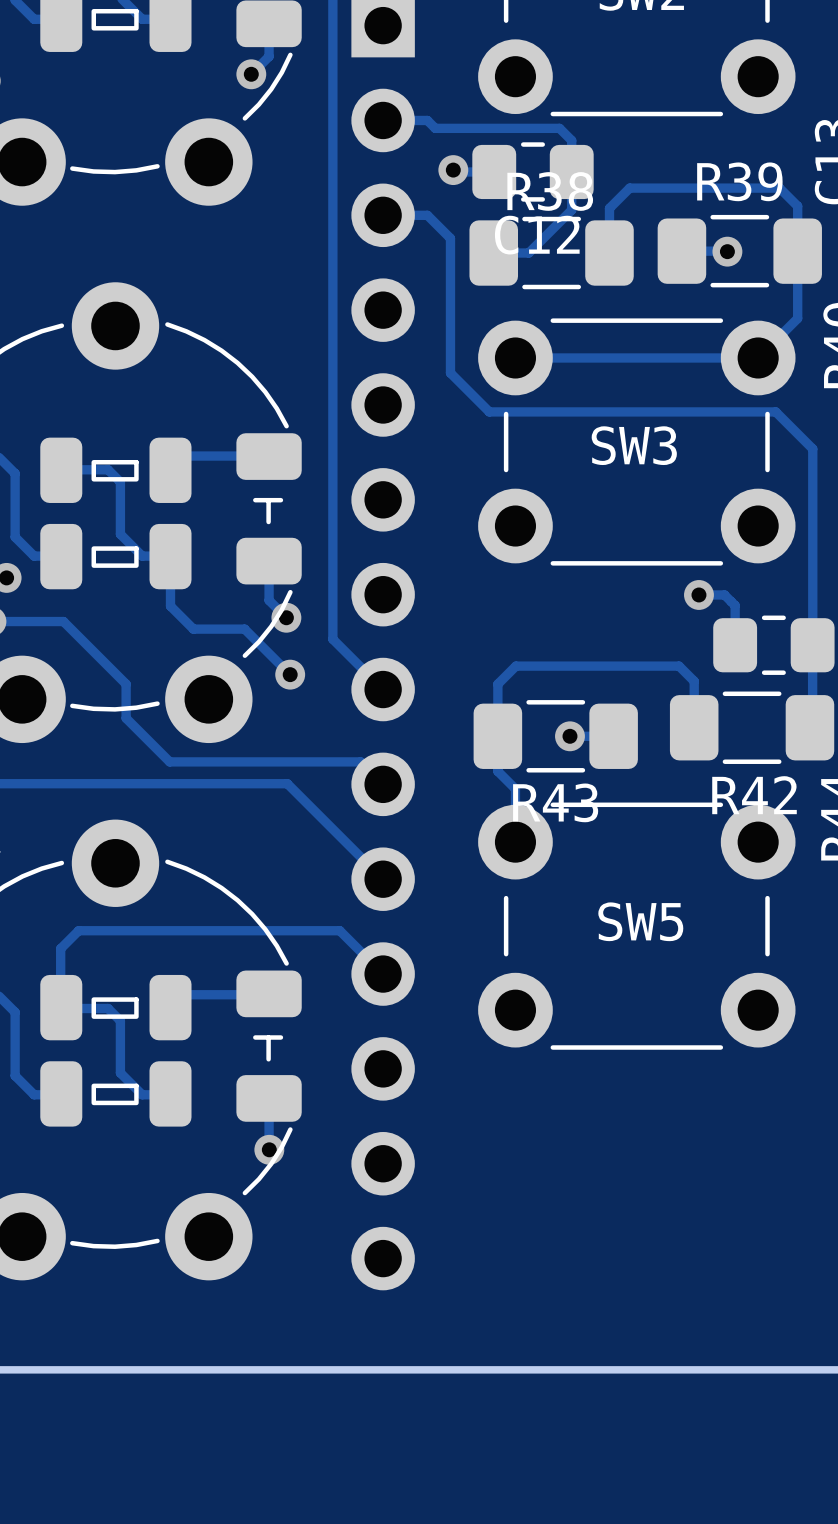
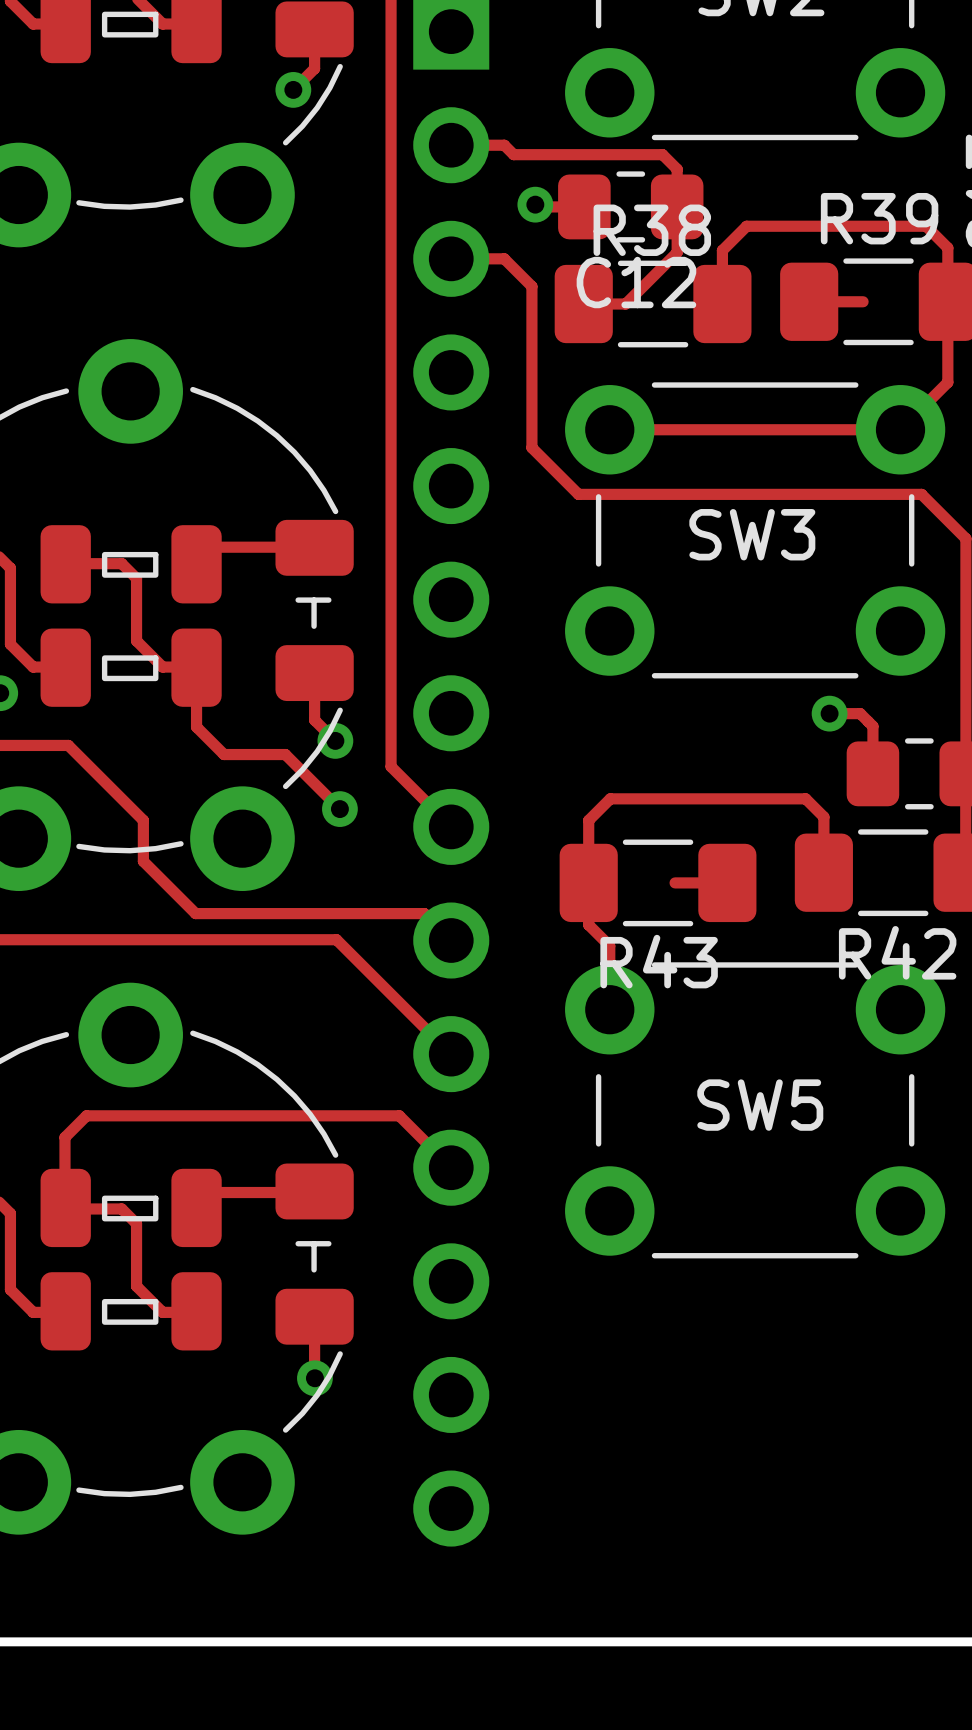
via: (727, 251) -> none
via: (569, 736) -> none

